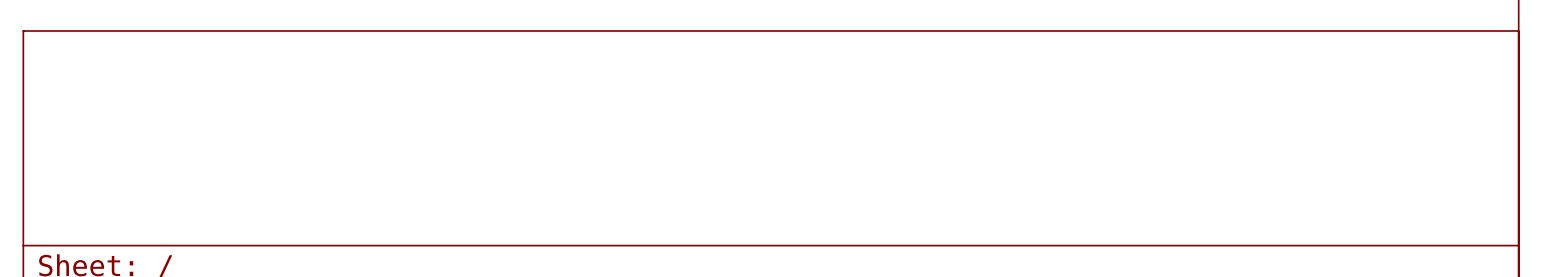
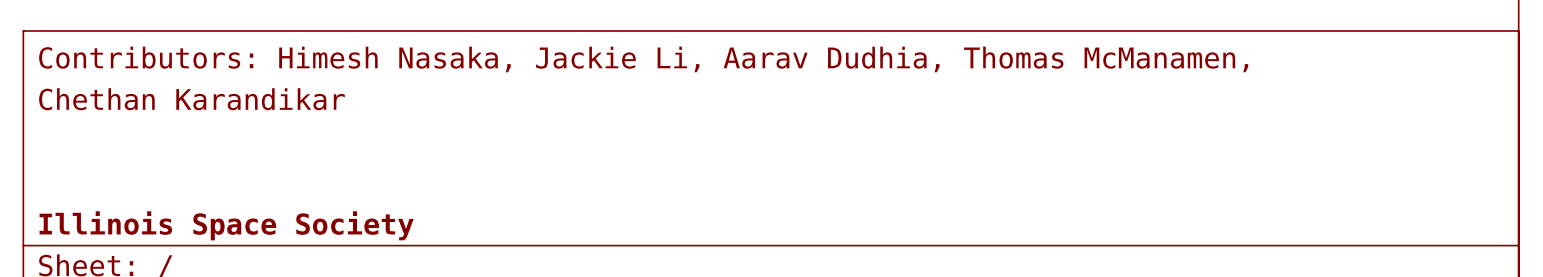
title block: none -> Contributors: Himesh Nasaka, Jackie Li, Aarav Dudhia, Thomas McManamen, (643, 59)
title block: none -> Chethan Karandikar (191, 99)
title block: none -> Illinois Space Society (226, 225)

